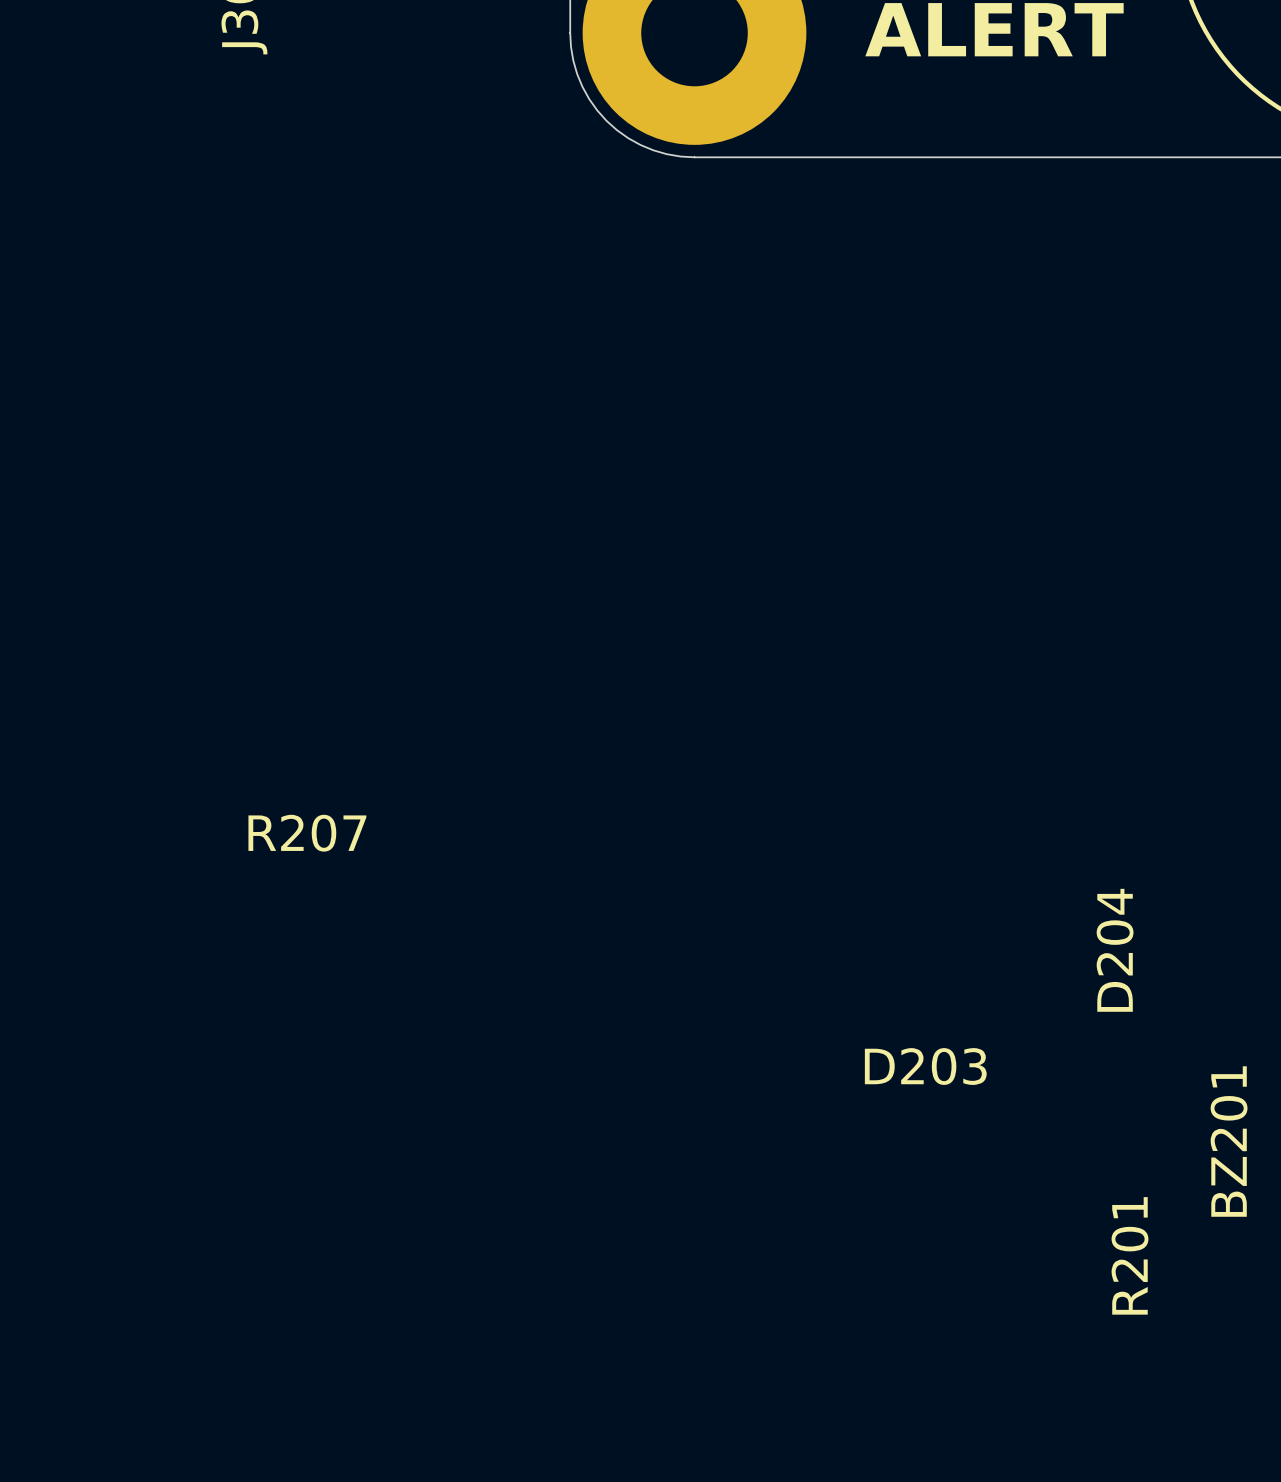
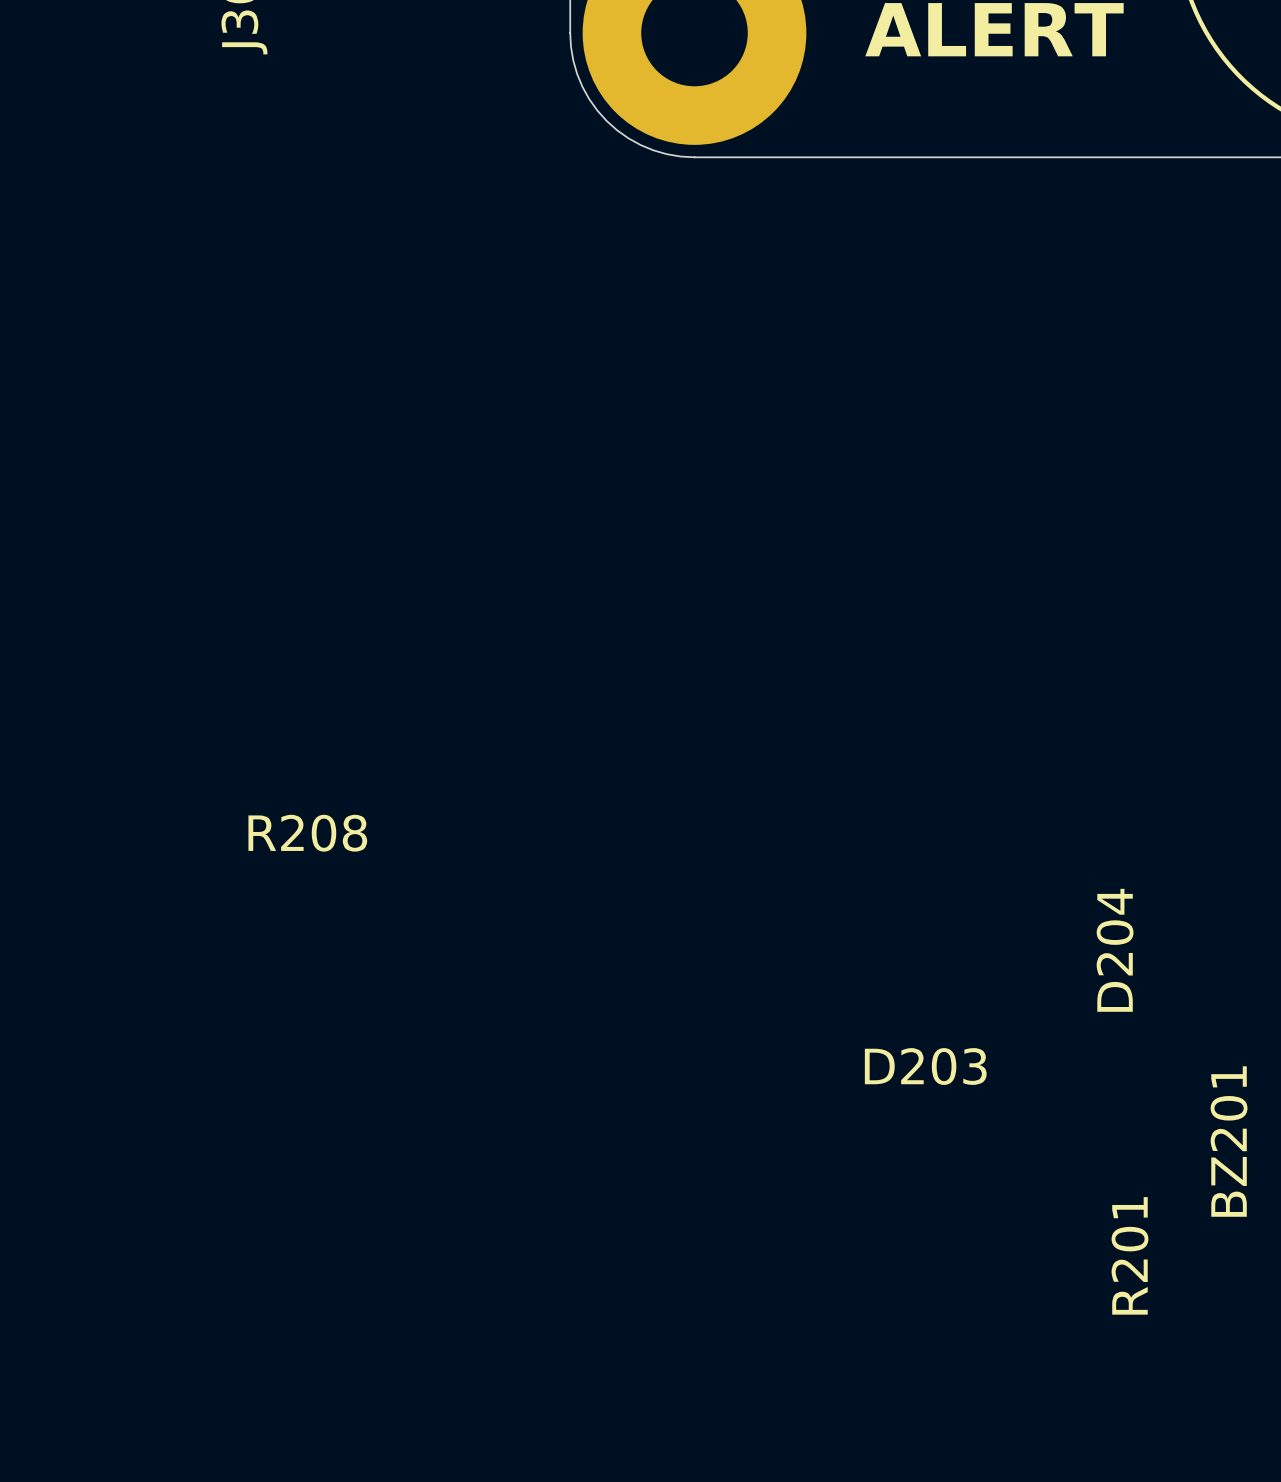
R207 name: R207 (307, 833) -> R208 (307, 833)

